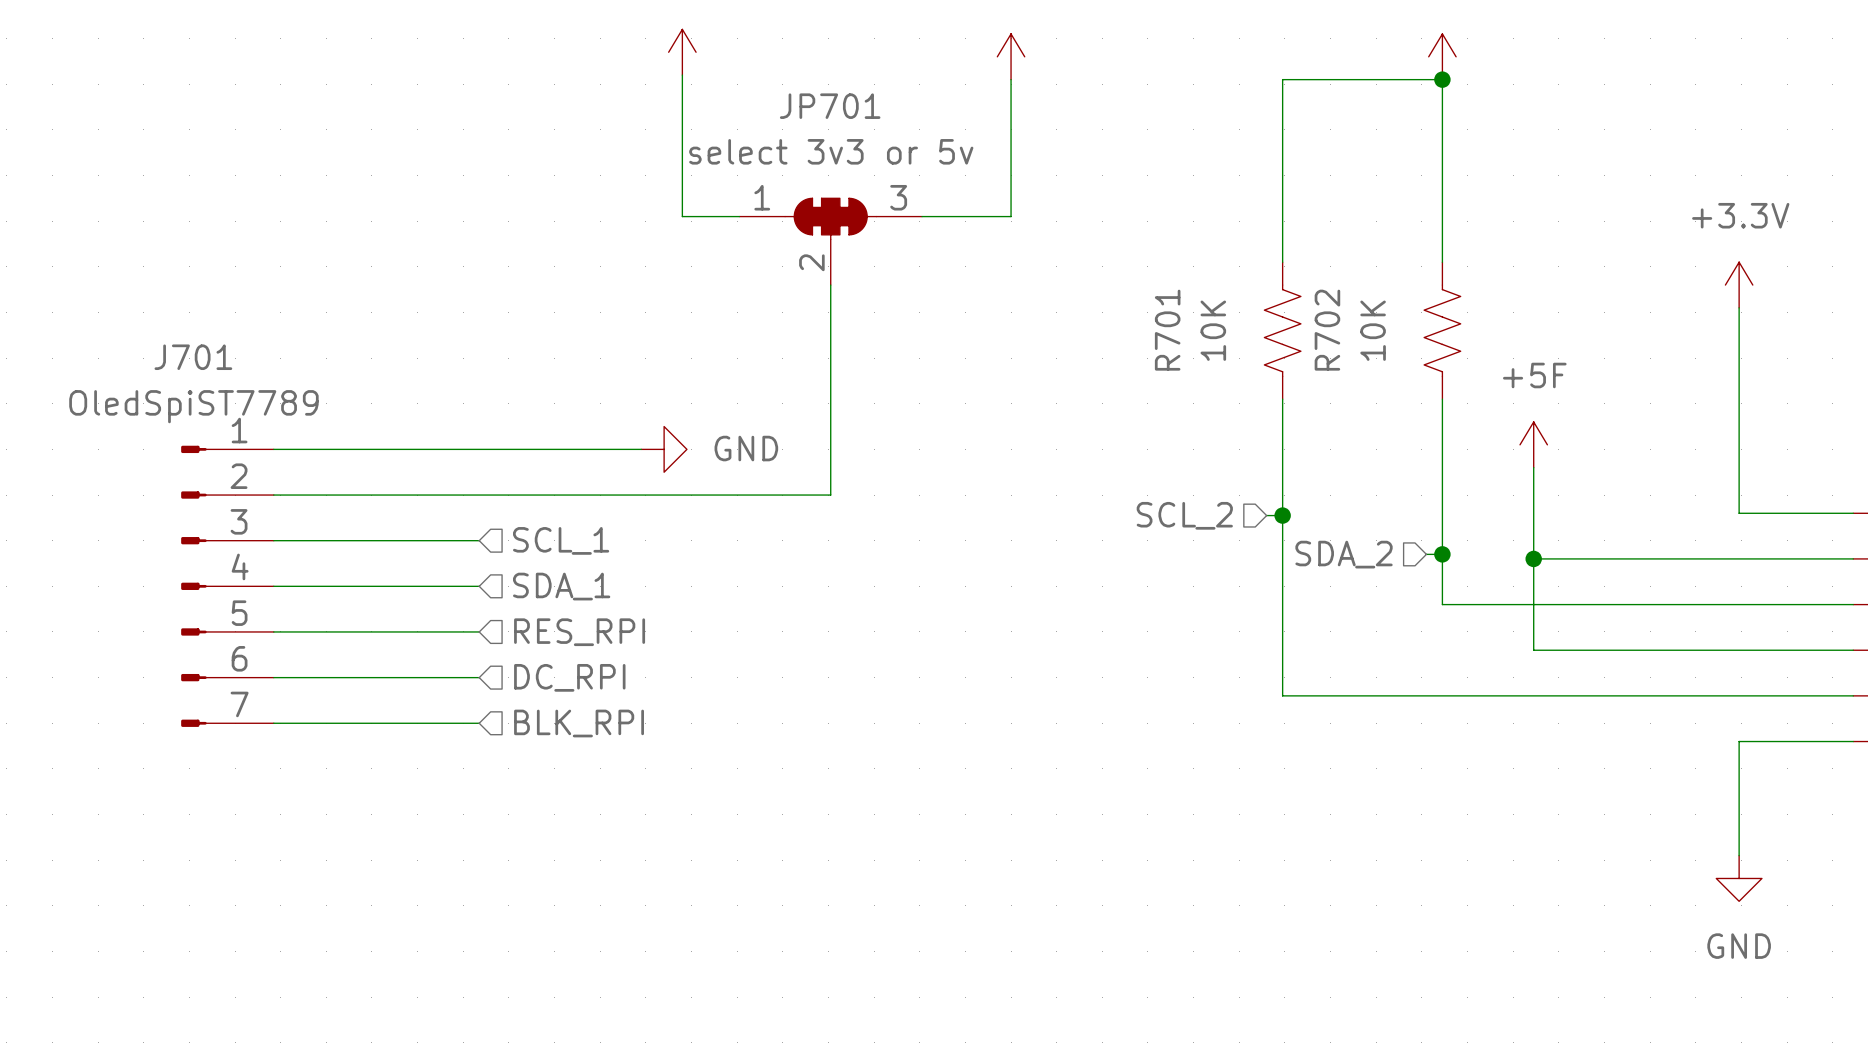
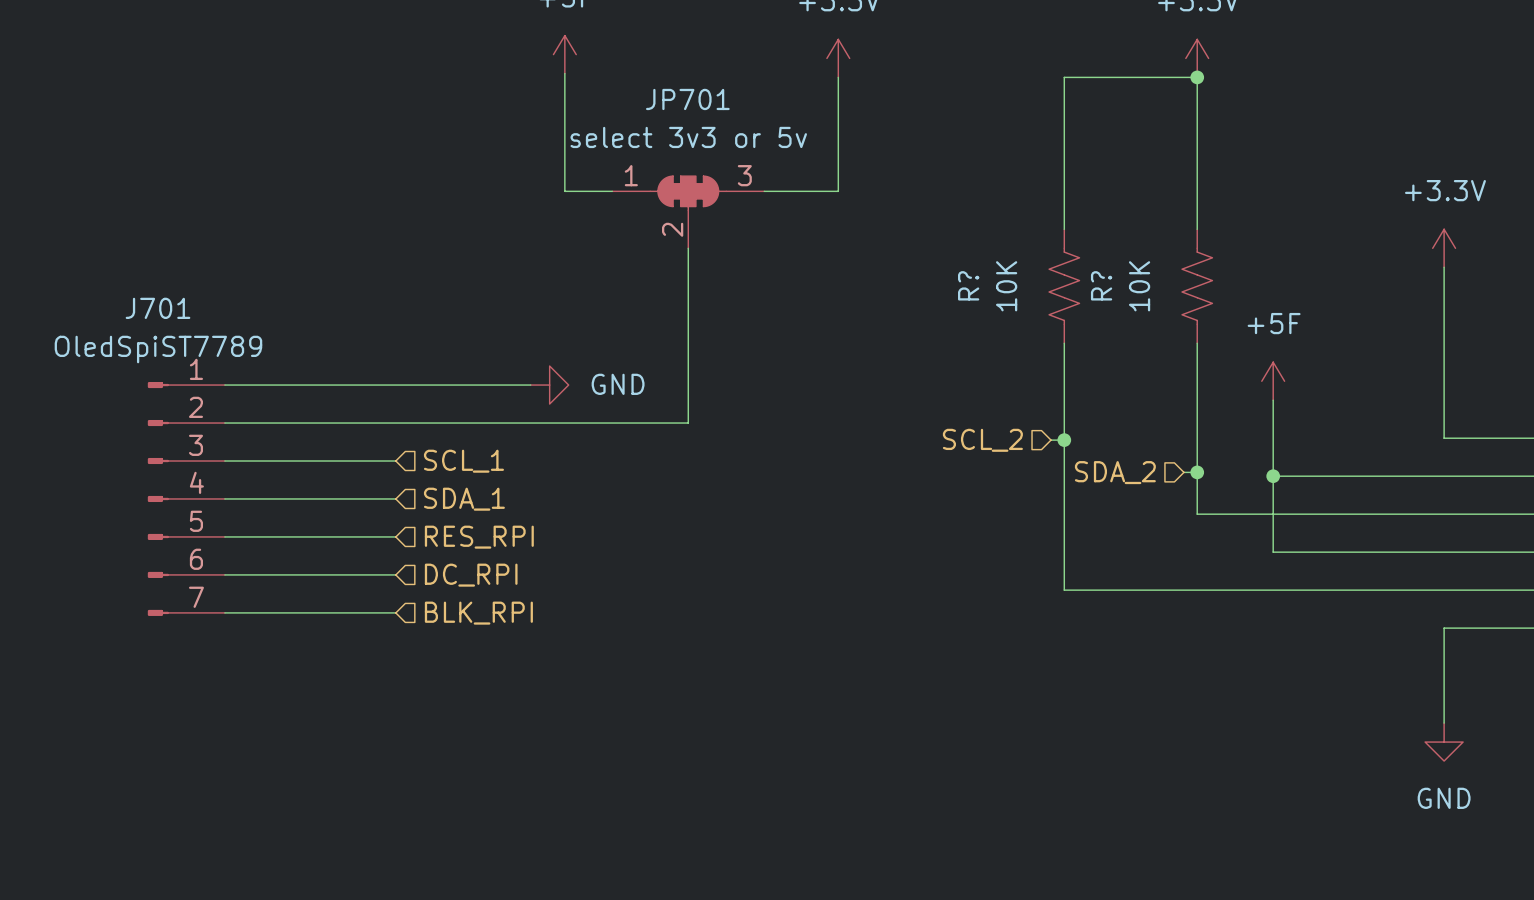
R701 name: R701 (1167, 330) -> R? (968, 285)
R702 name: R702 (1327, 330) -> R? (1101, 285)

